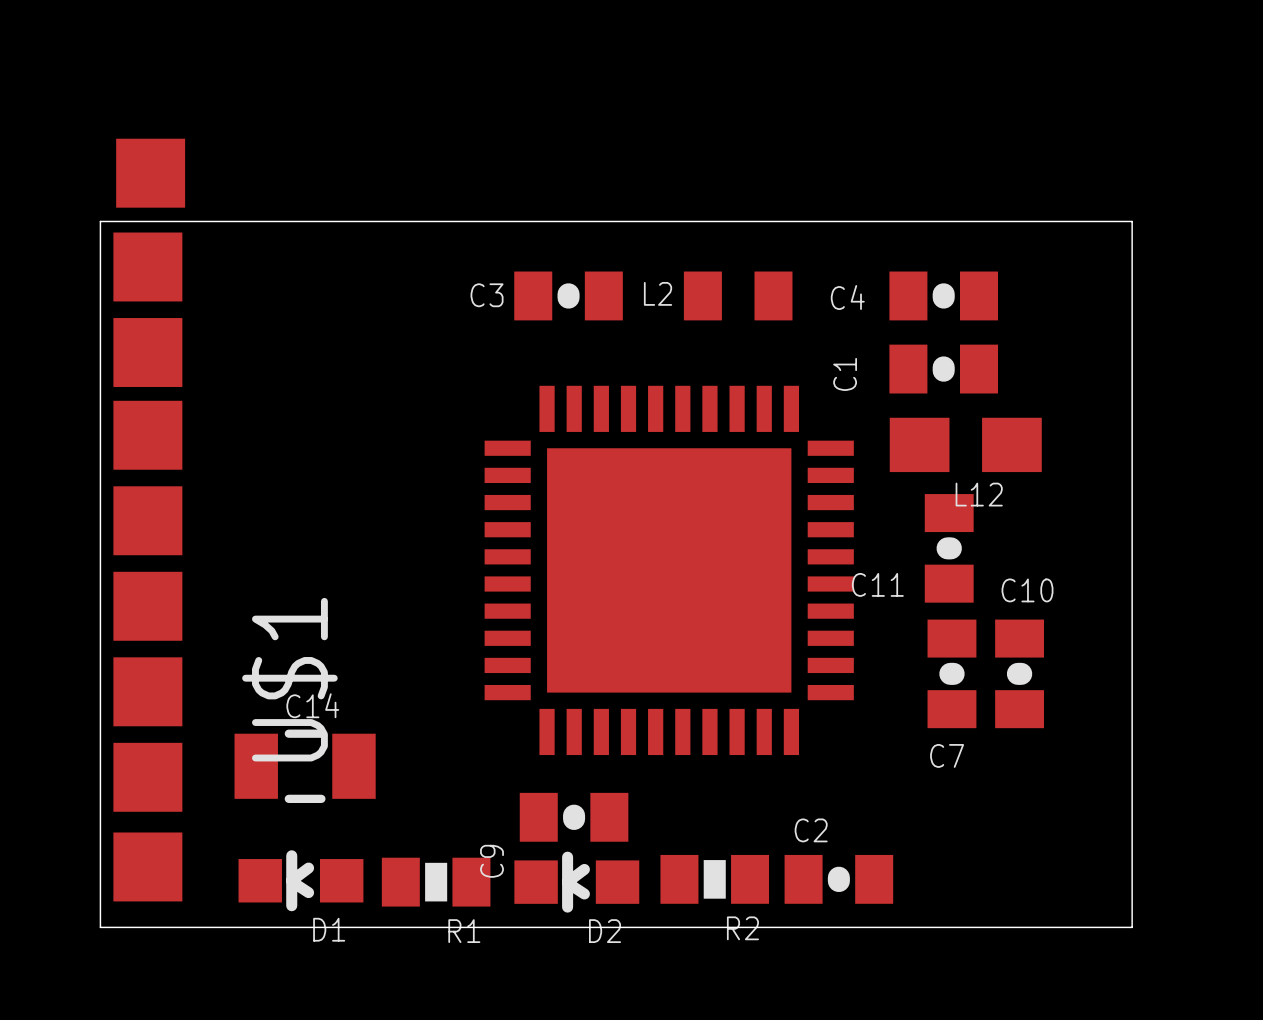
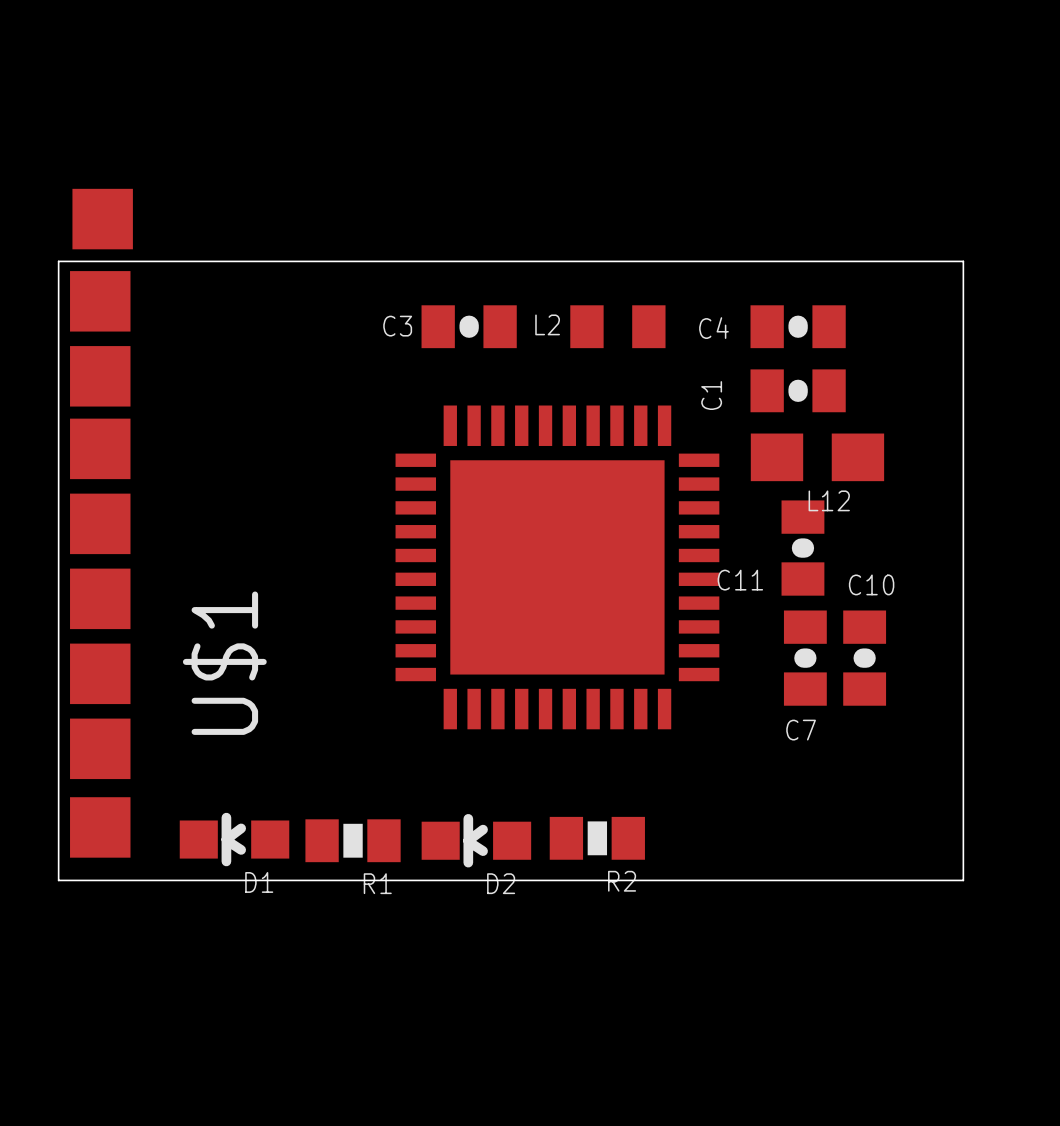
C14: (305, 766) -> none
C9: (574, 817) -> none
C2: (838, 879) -> none

